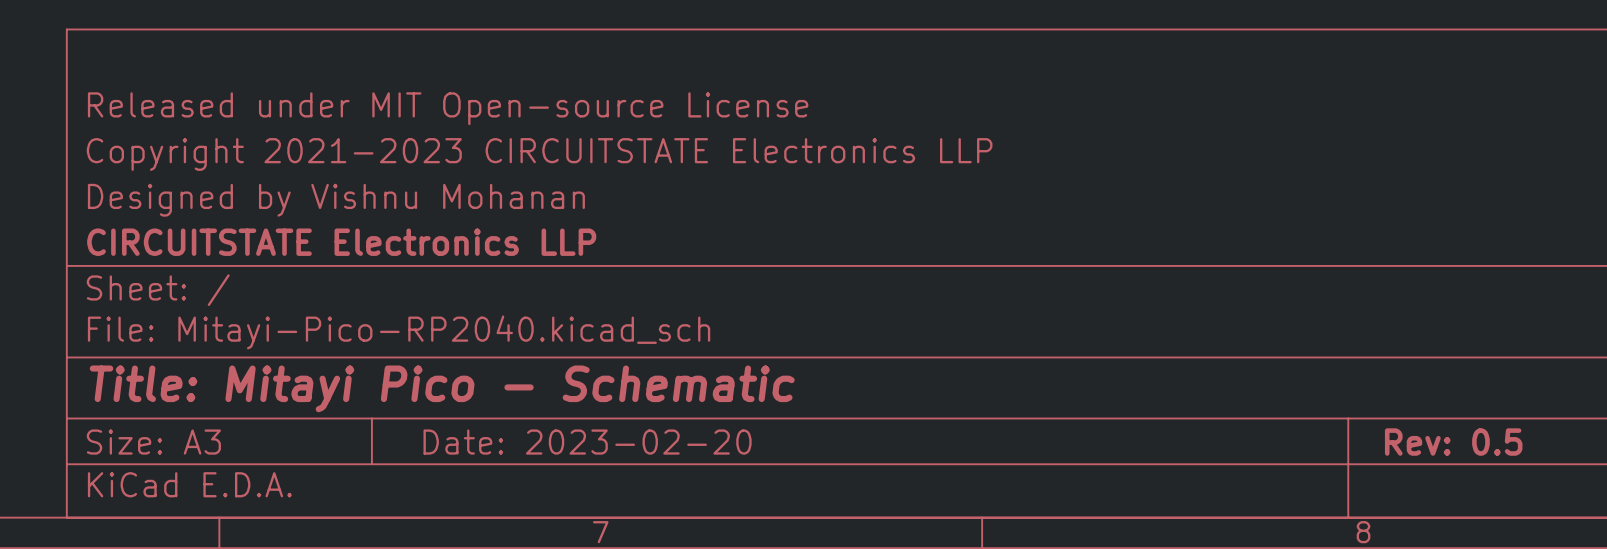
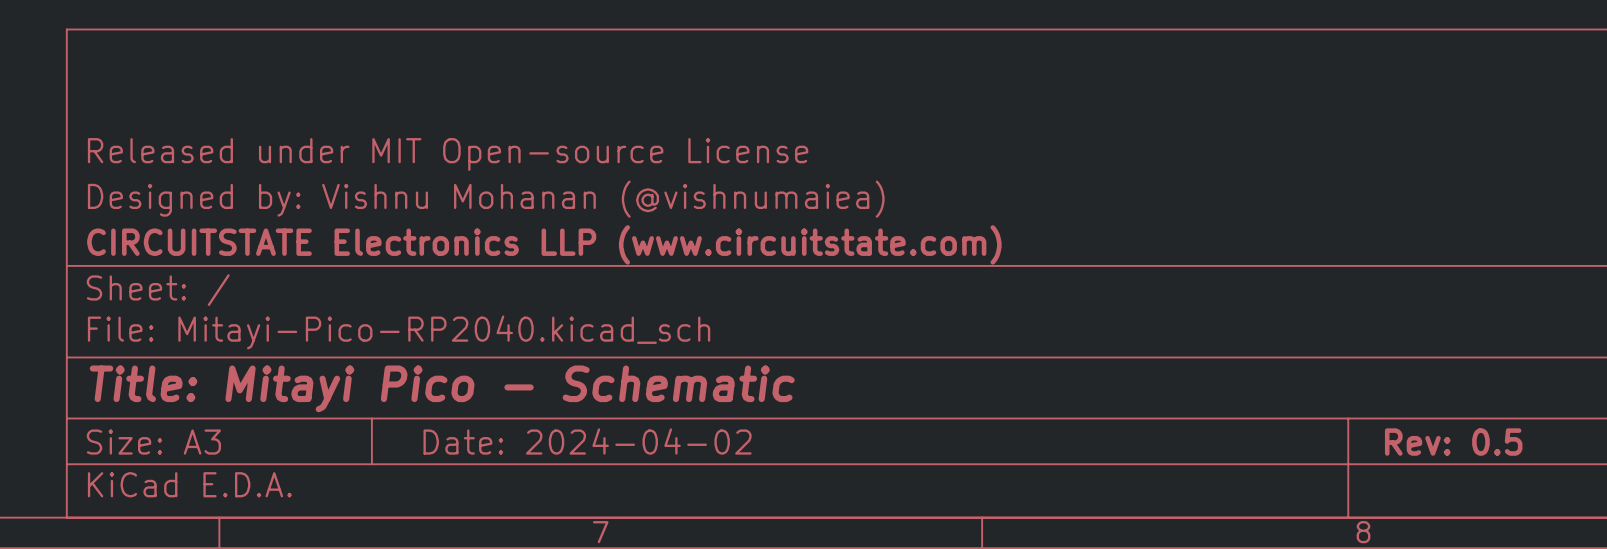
title block: Released under MIT Open-source License (448, 108) -> none
title block: Copyright 2021-2023 CIRCUITSTATE Electronics LLP (539, 154) -> Released under MIT Open-source License (448, 154)
title block: Designed by Vishnu Mohanan (336, 200) -> Designed by: Vishnu Mohanan (@vishnumaiea) (486, 199)
title block: CIRCUITSTATE Electronics LLP (341, 242) -> CIRCUITSTATE Electronics LLP (www.circuitstate.com) (544, 244)
title block: Date: 2023-02-20 (587, 442) -> Date: 2024-04-02 (587, 441)

